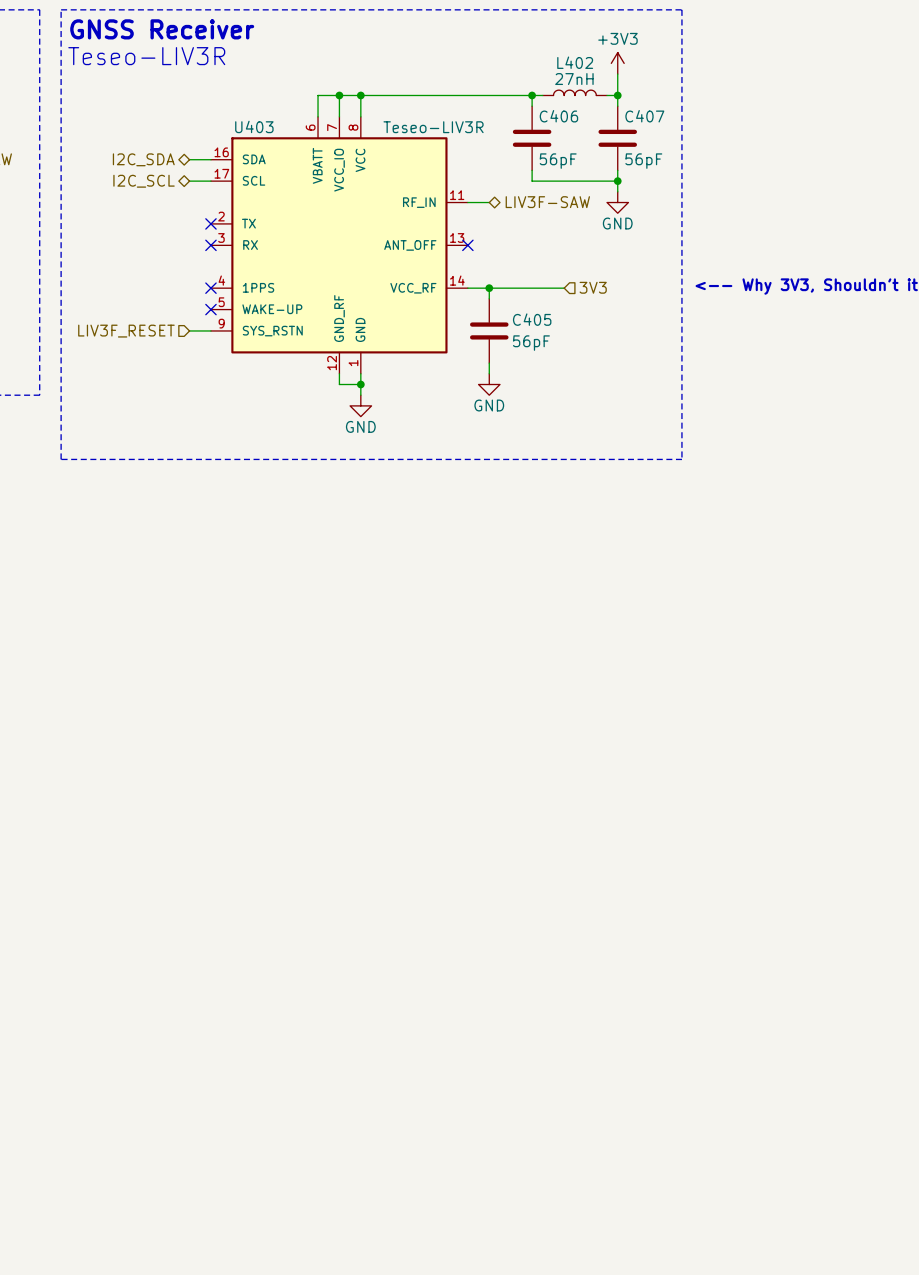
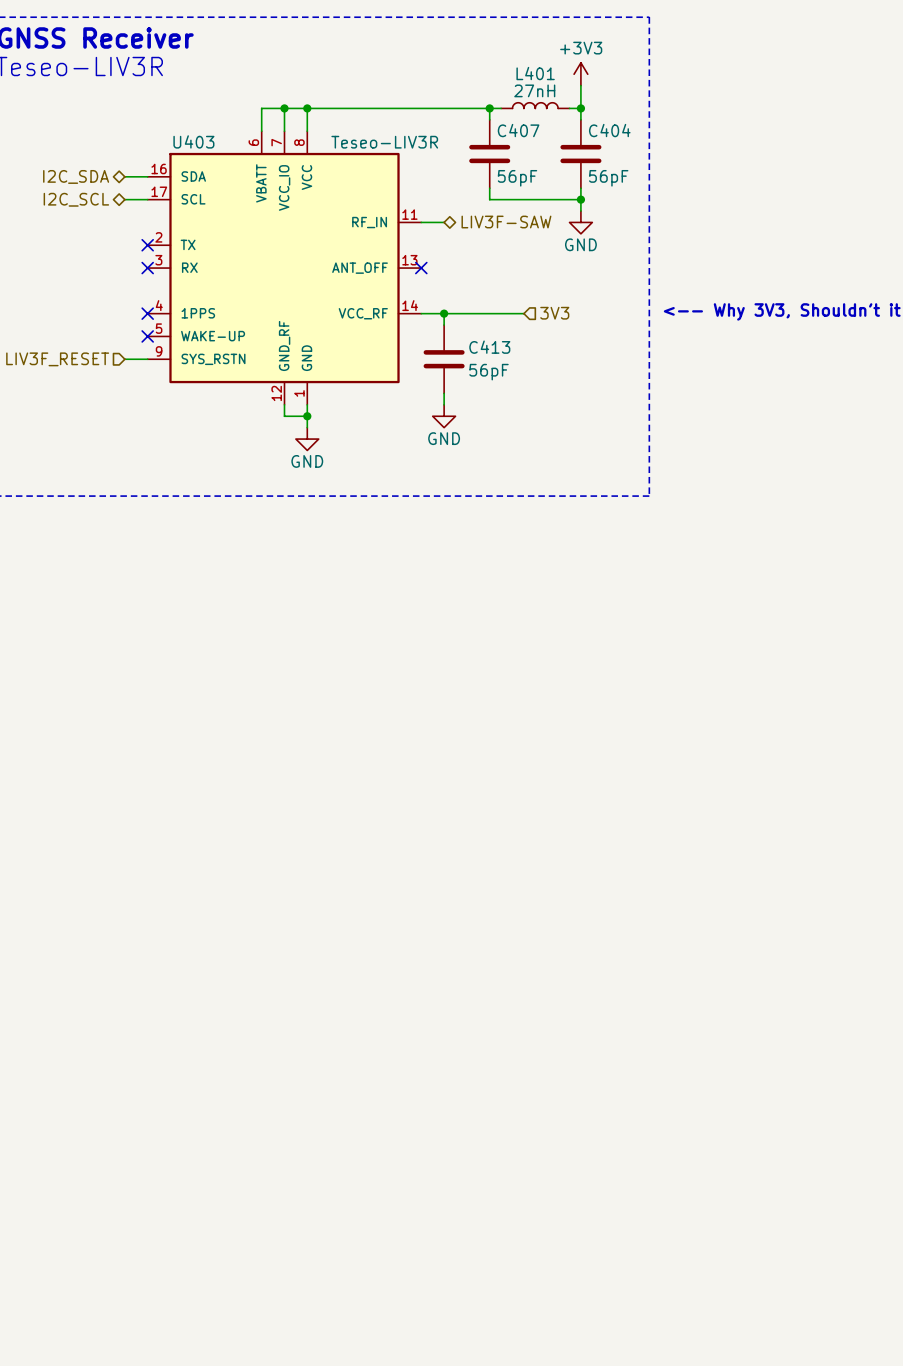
L402 name: L402 (575, 62) -> L401 (535, 73)
C406 name: C406 (558, 116) -> C407 (518, 130)
C407 name: C407 (644, 116) -> C404 (609, 130)
C405 name: C405 (532, 319) -> C413 (489, 347)

